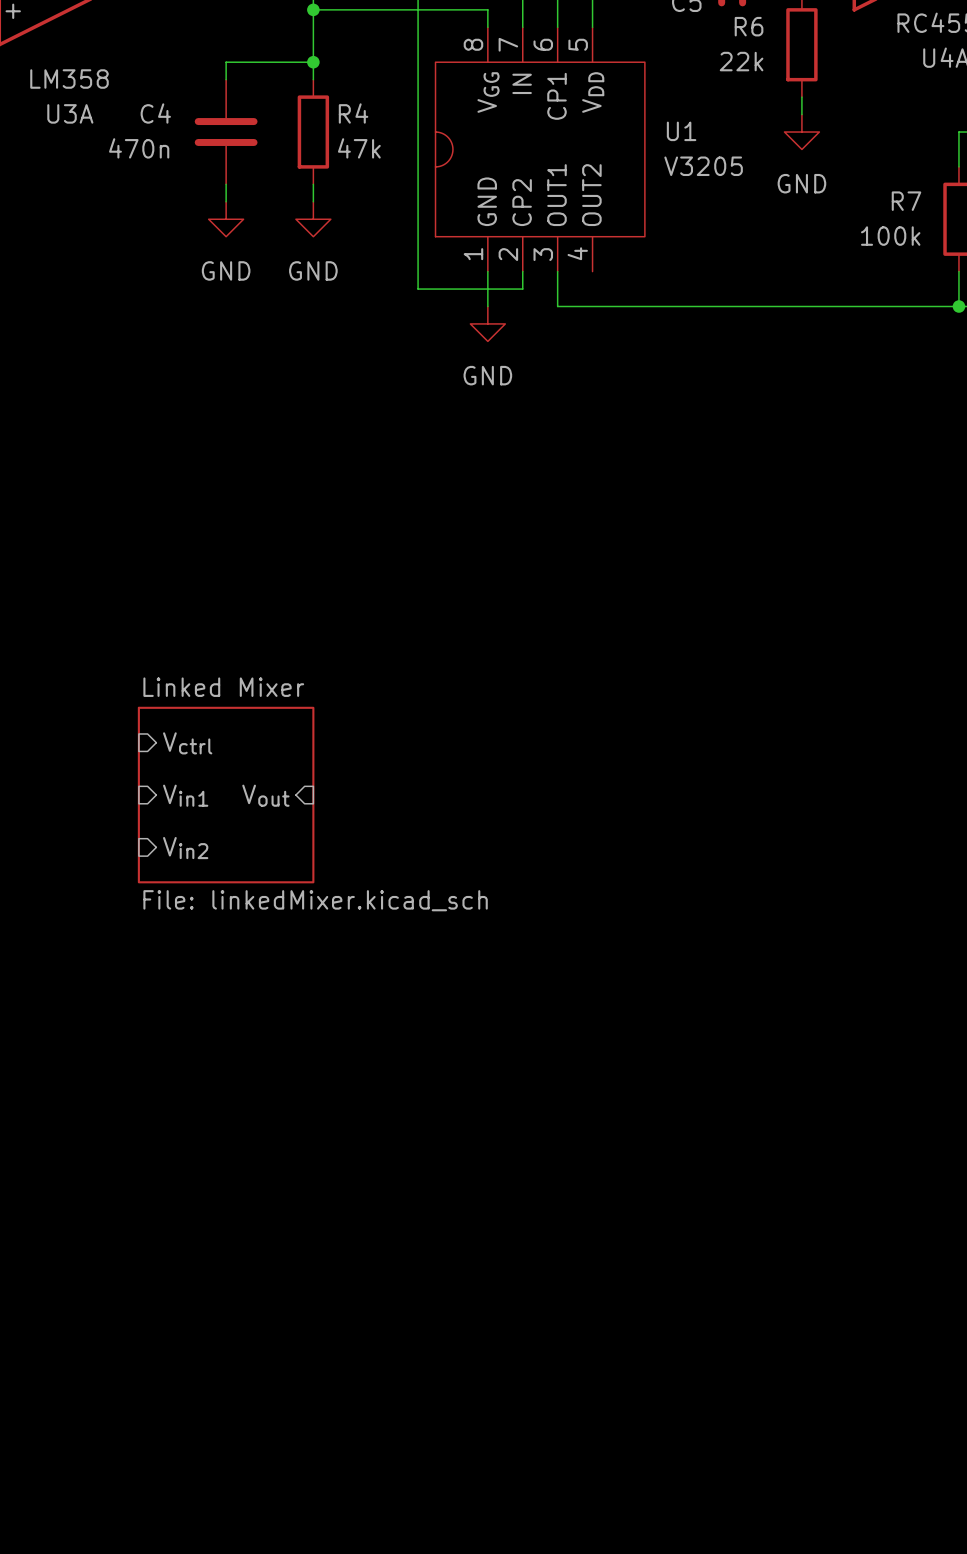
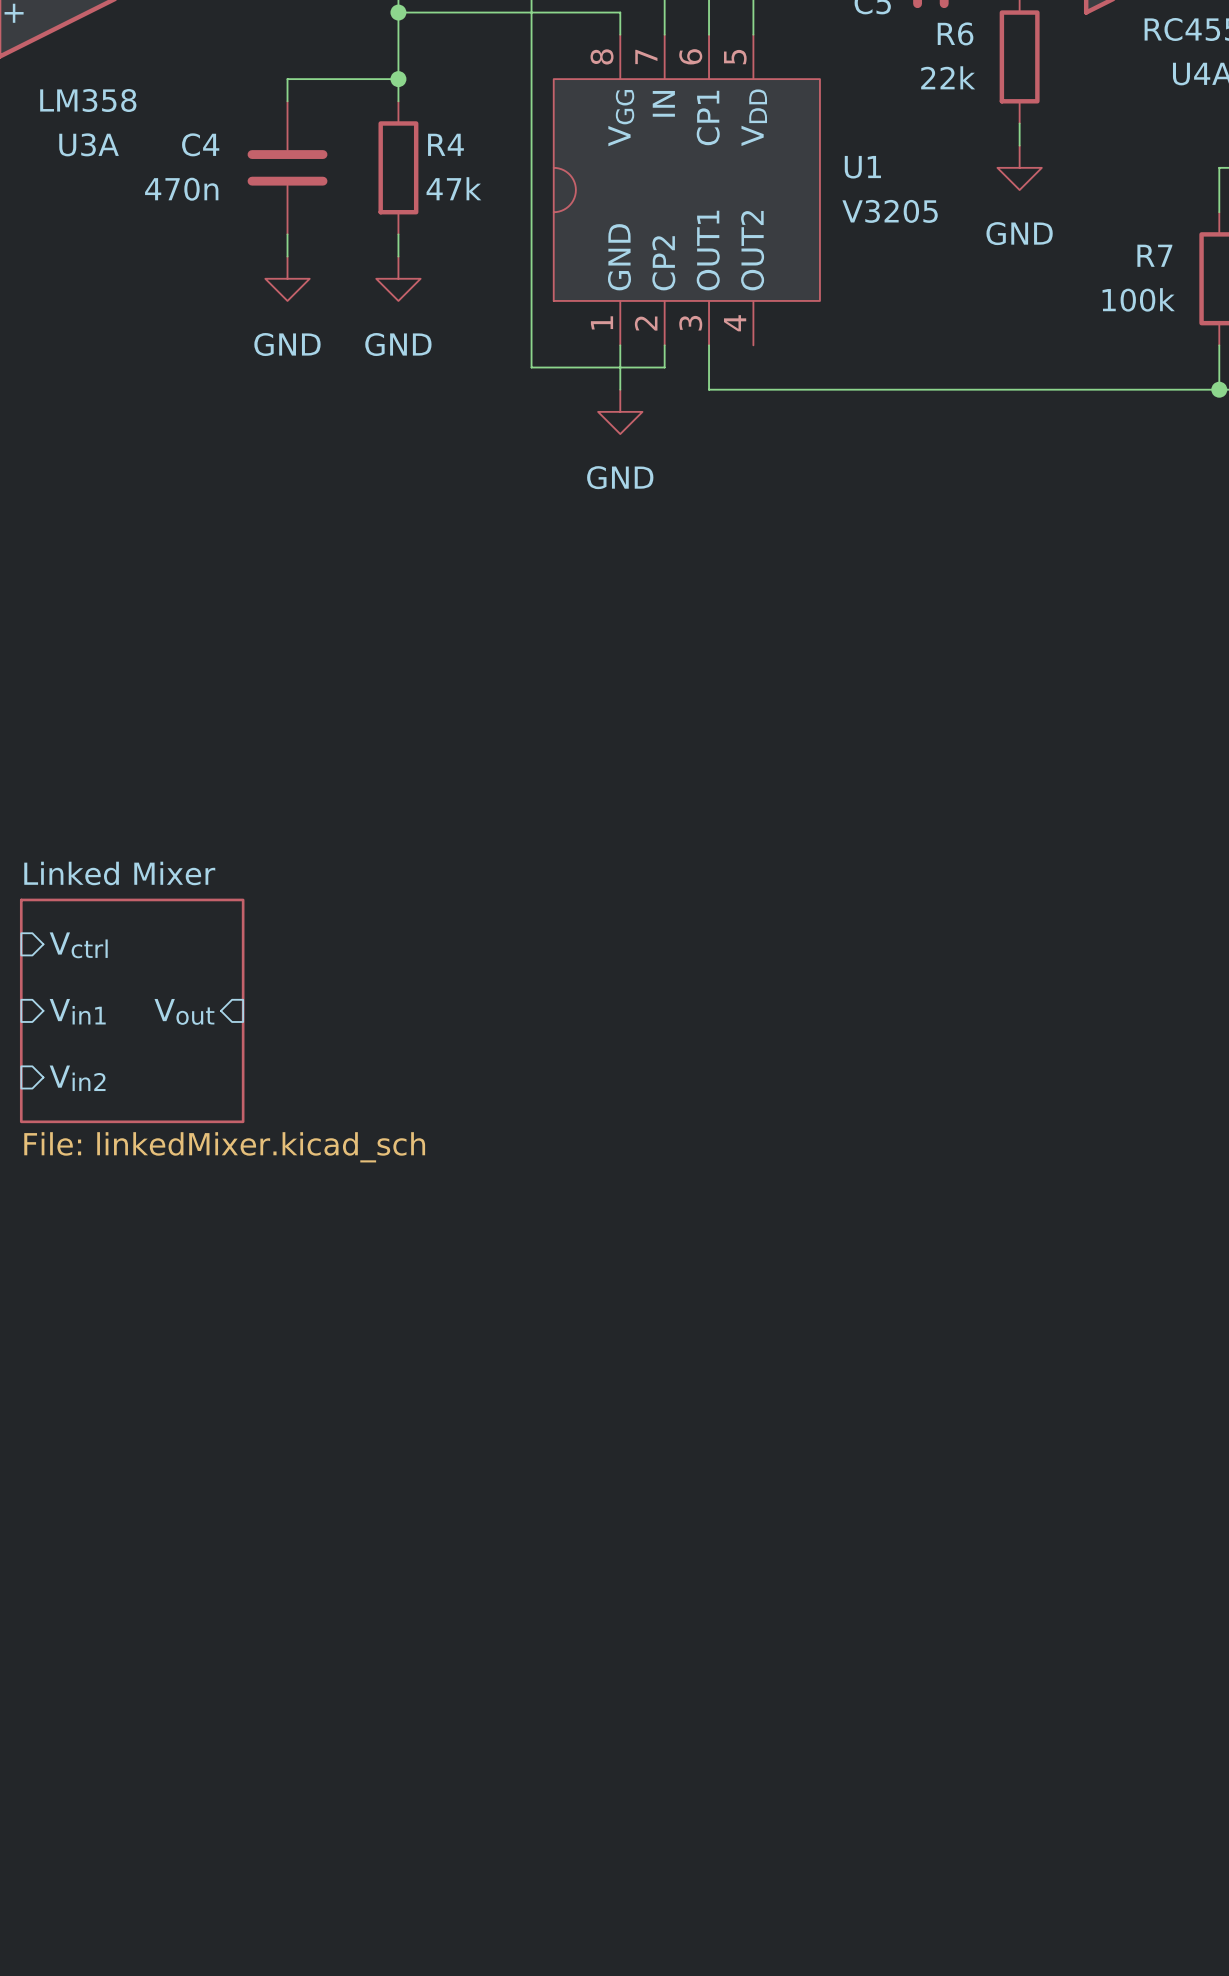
sheet pin position: Vctrl (187, 743) -> Vctrl (78, 945)
sheet pin: none -> Vin1 (77, 1011)
sheet pin: Vin1 (185, 795) -> Vout (184, 1011)
sheet Linked Mixer position: (226, 795) -> (132, 1010)
sheet pin: Vout (265, 795) -> none
sheet pin position: Vin2 (185, 848) -> Vin2 (77, 1078)

